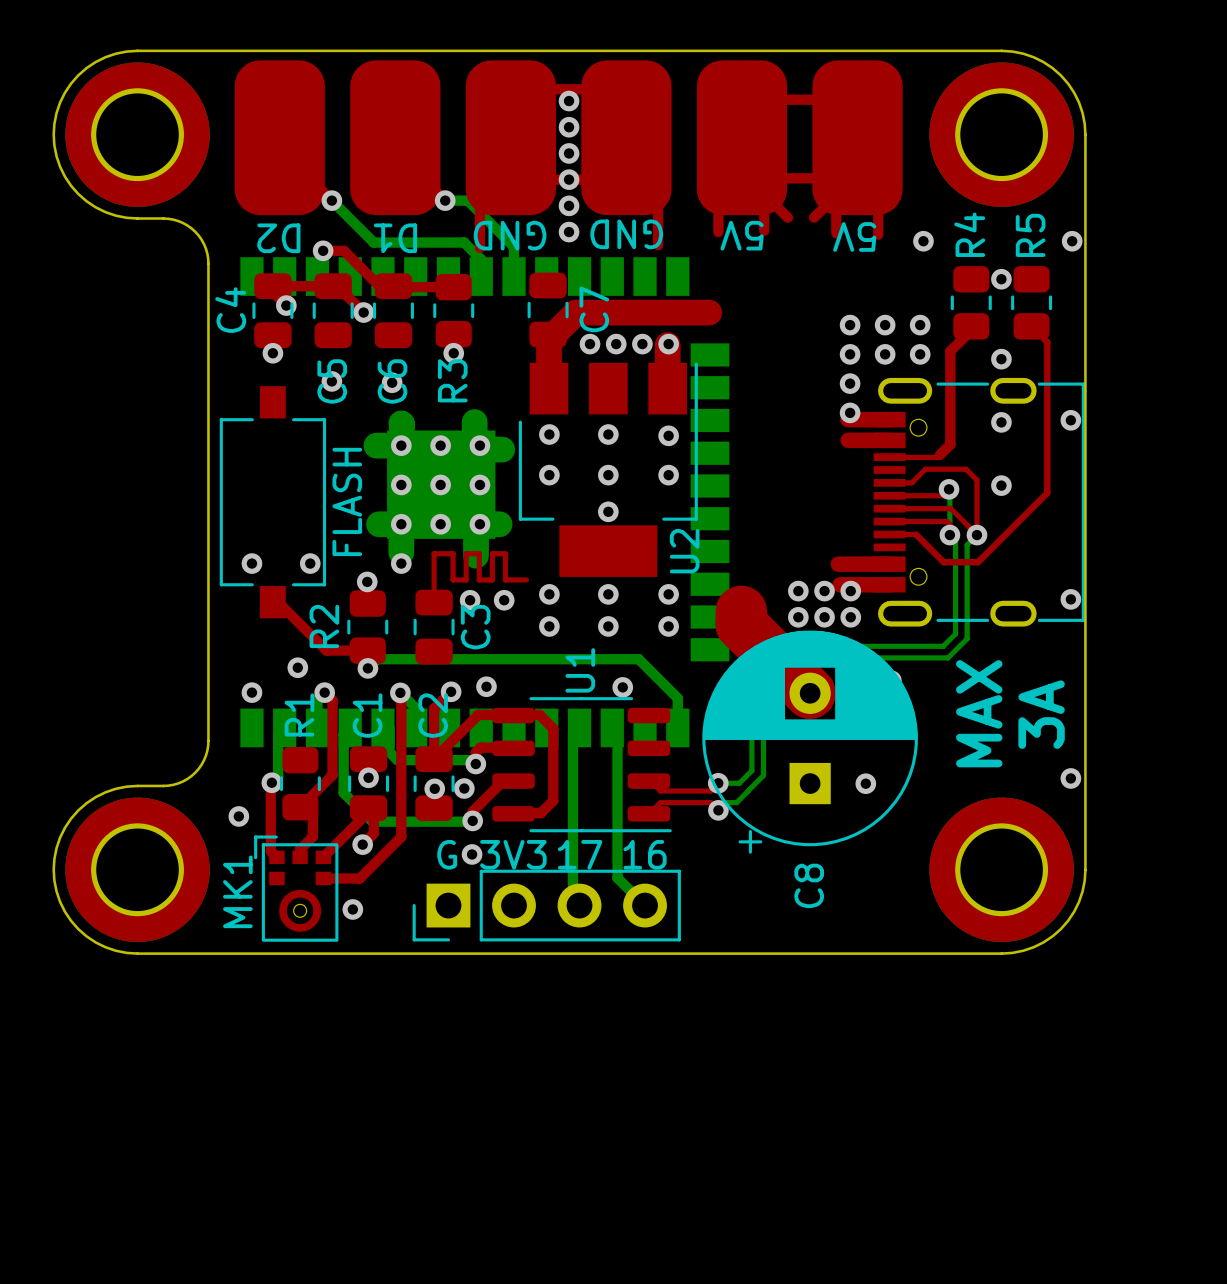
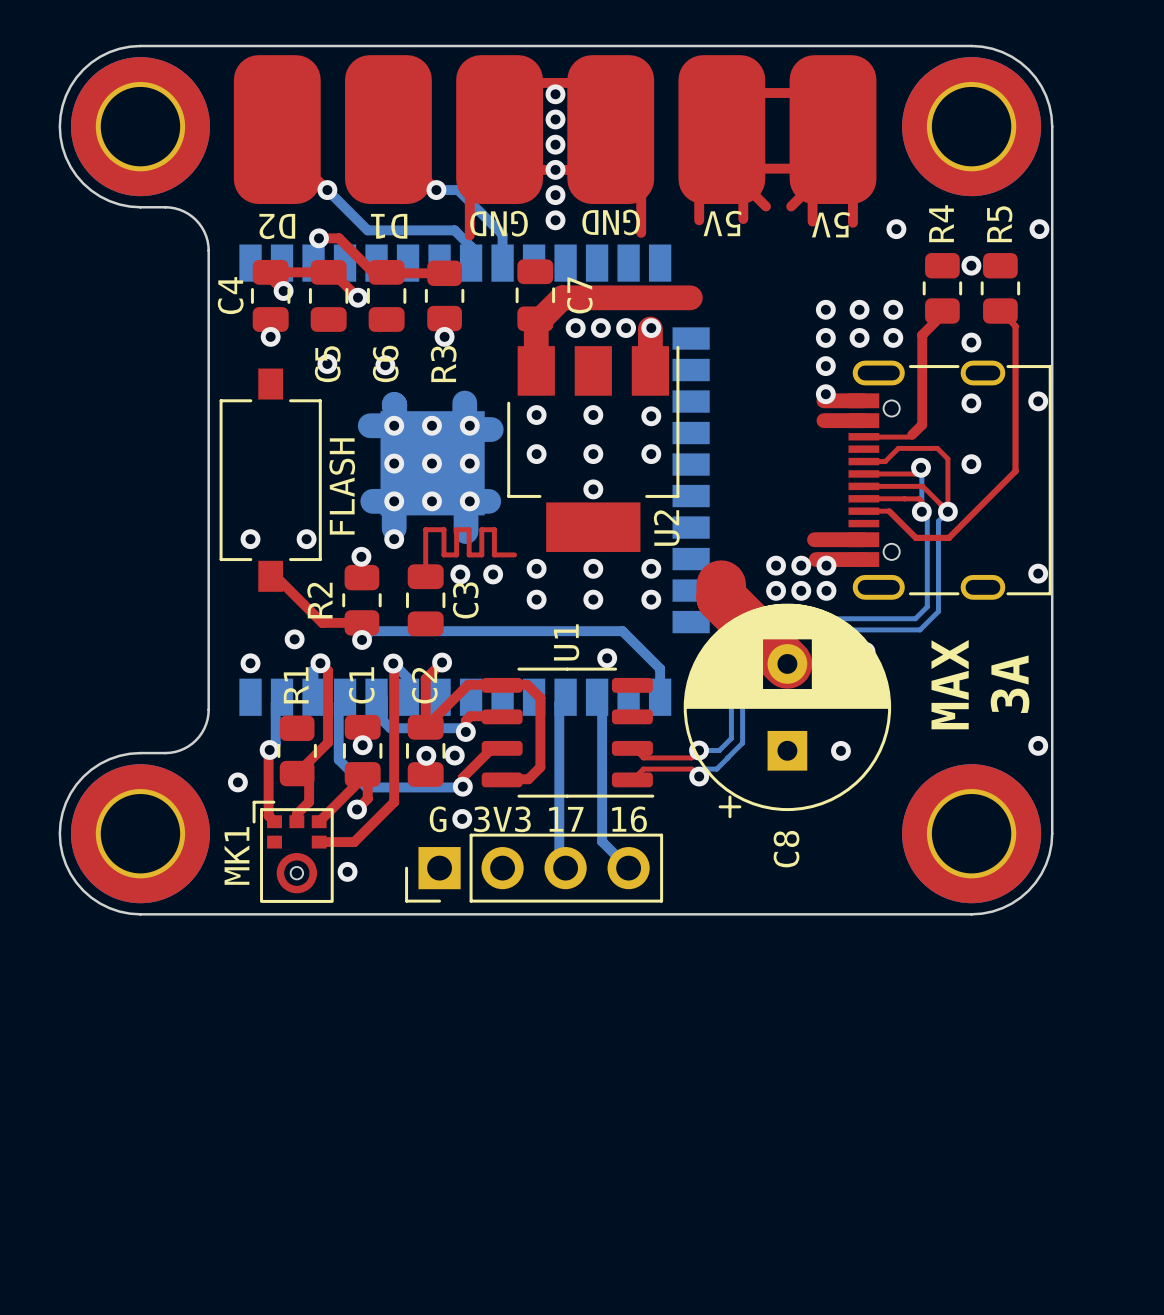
via: (486, 686) -> none

